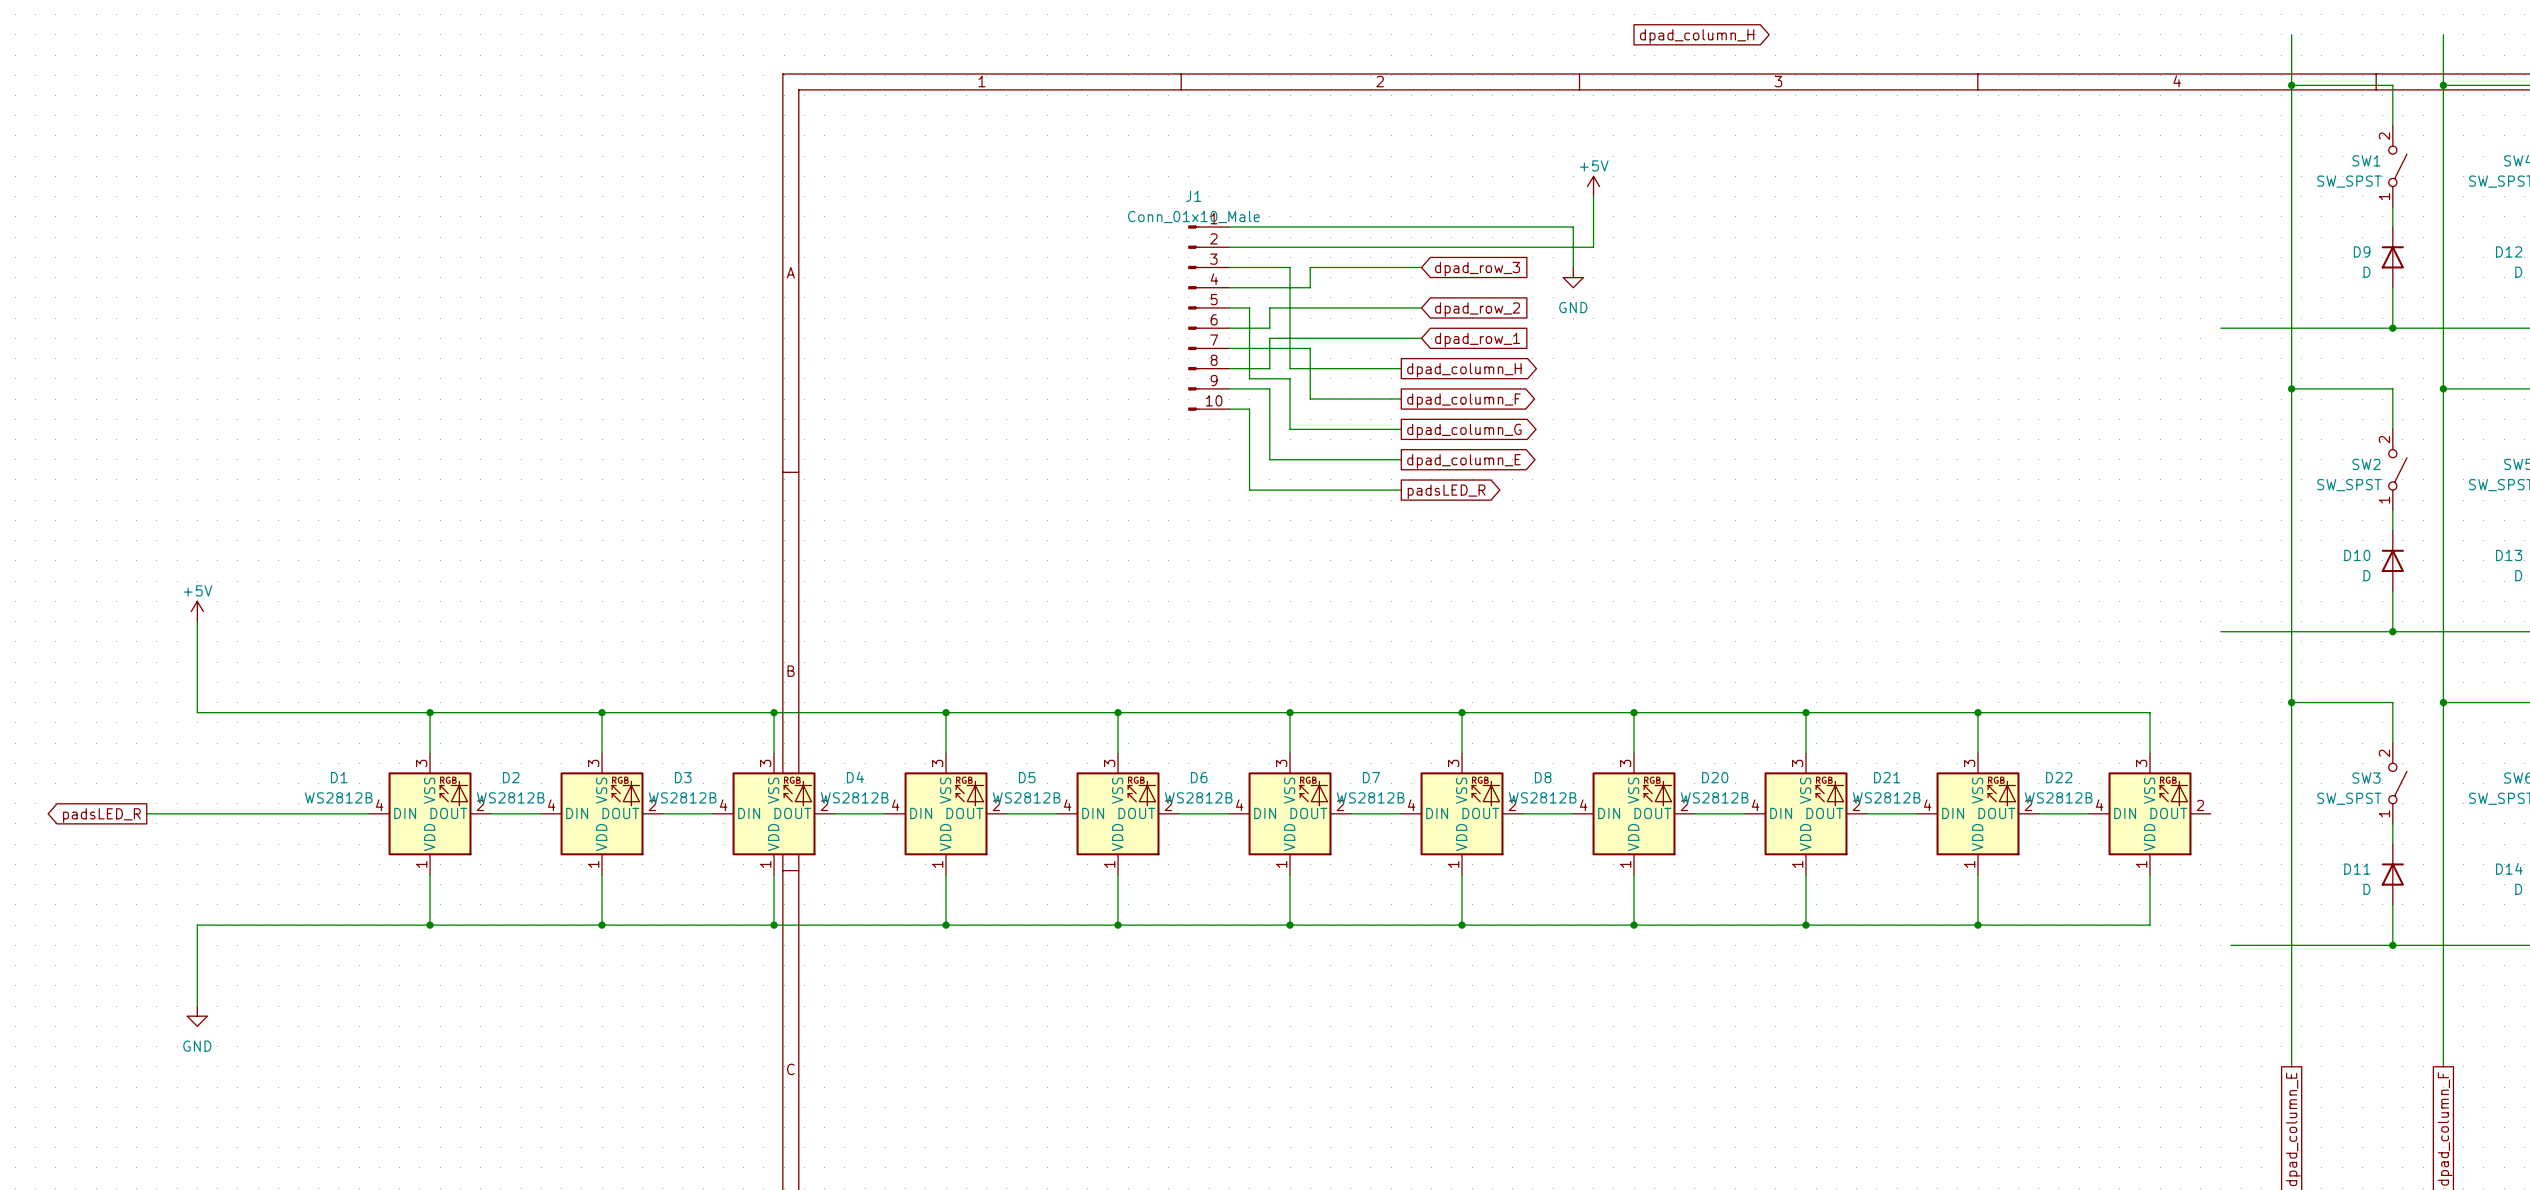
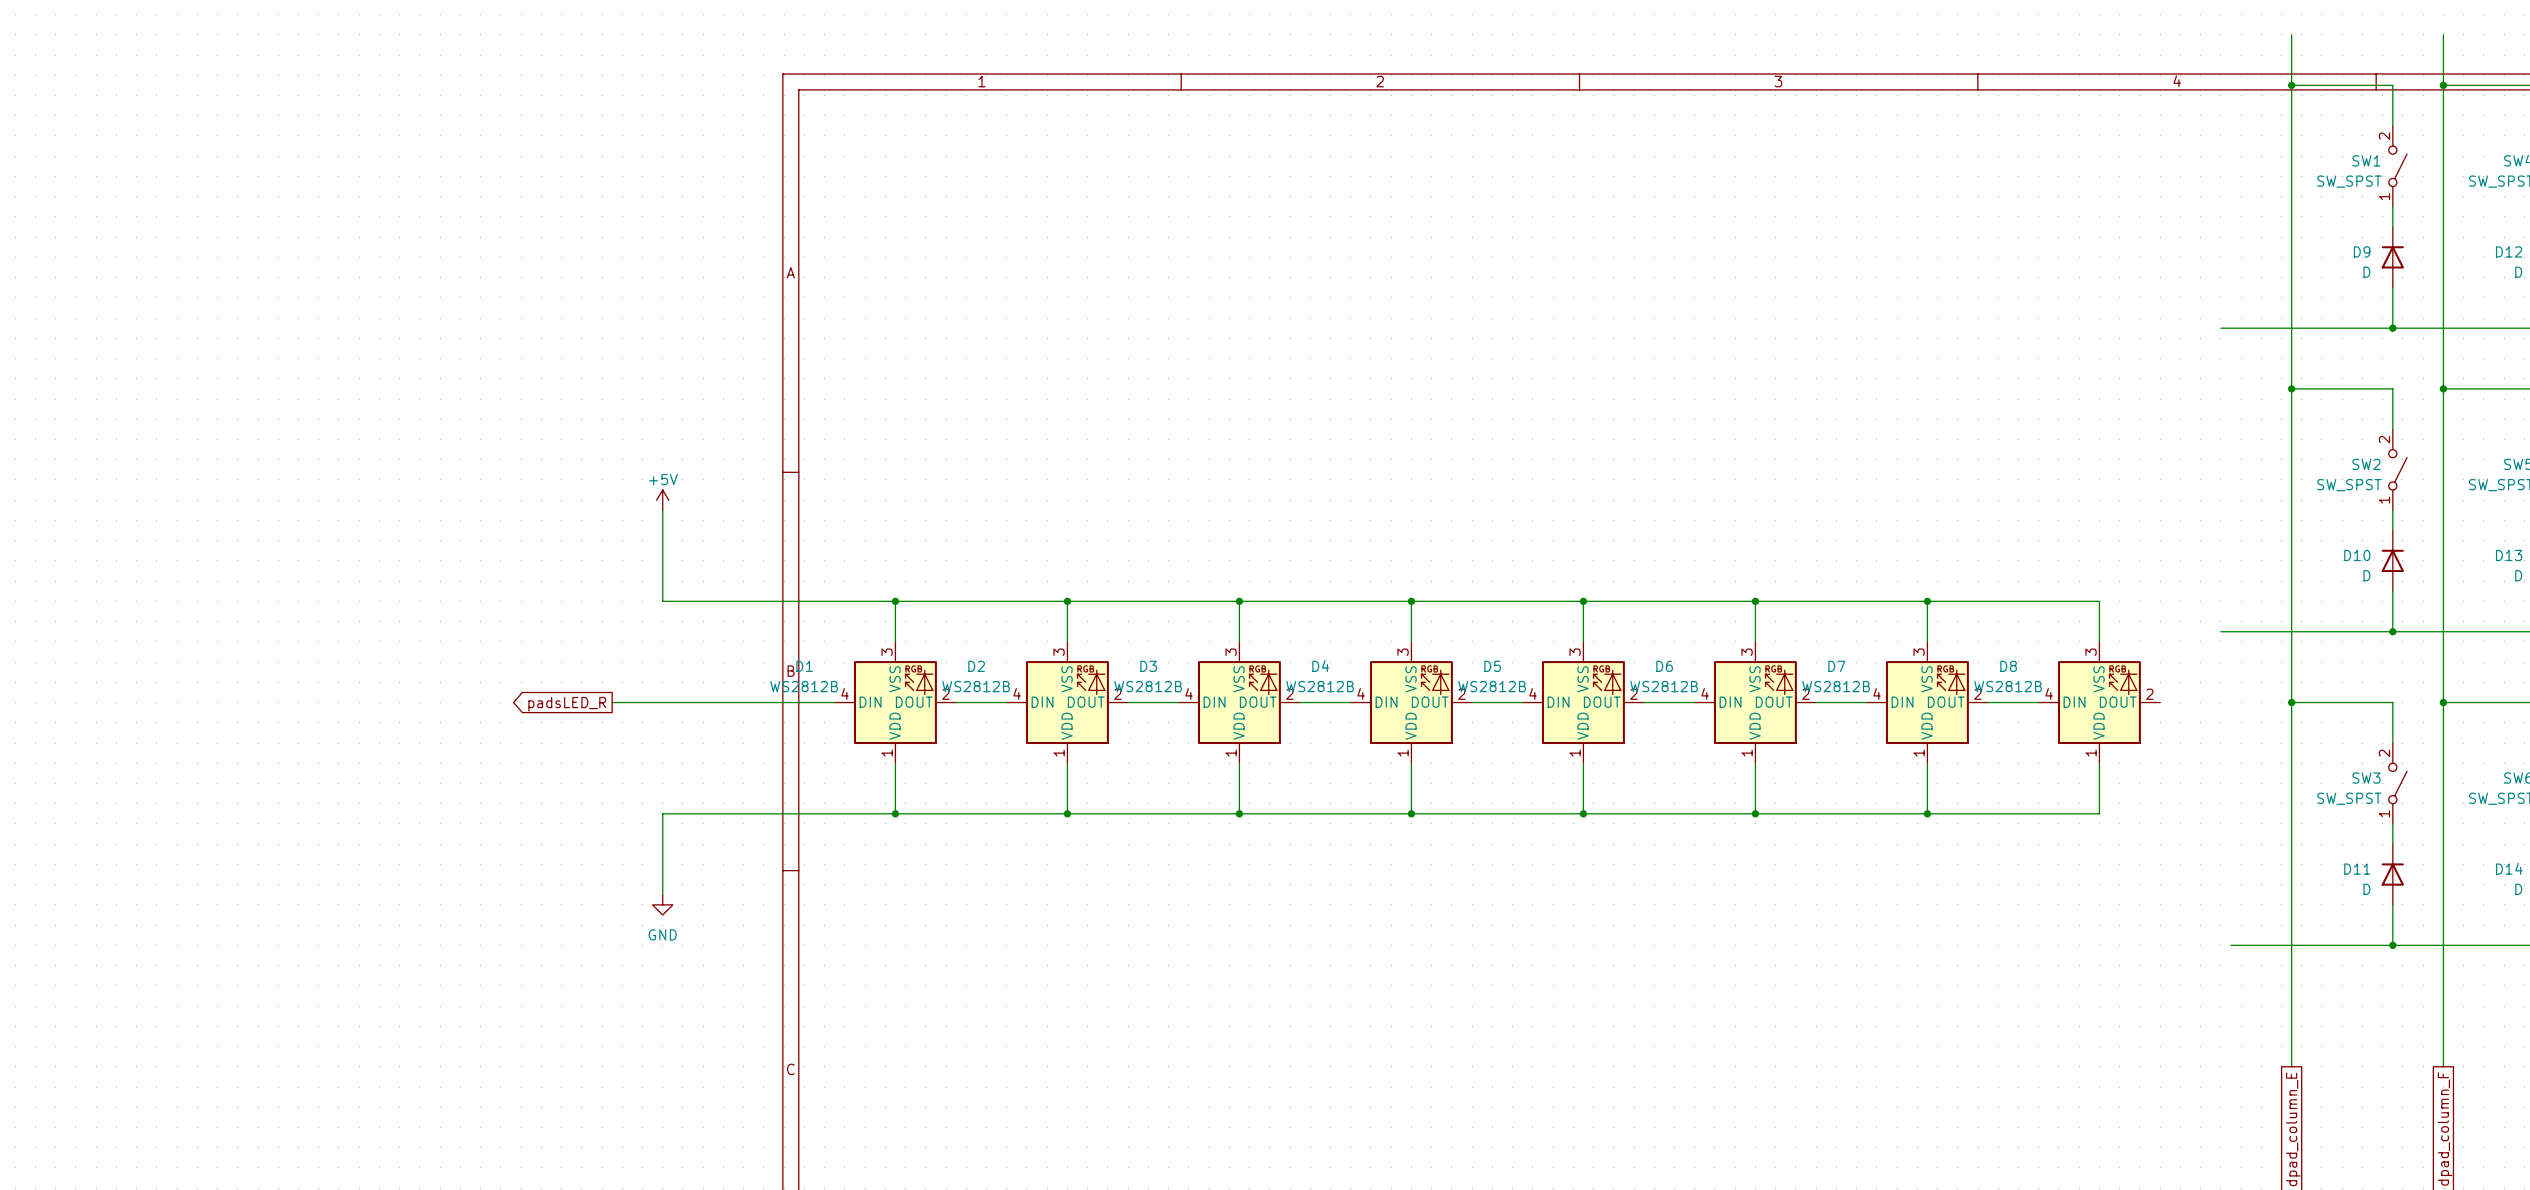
global label: dpad_column_H (1697, 36) -> none
power symbol: +5V (1593, 186) -> none
wire: (1593, 196) (1593, 247) (1229, 247) -> none
wire: (1229, 227) (1573, 227) (1573, 267) -> none
wire: (1229, 267) (1290, 267) (1290, 368) (1401, 368) -> none
wire: (1421, 267) (1310, 267) (1310, 287) (1229, 287) -> none
global label: dpad_row_3 (1477, 269) -> none
power symbol: GND (1573, 277) -> none
wire: (1229, 307) (1249, 307) (1249, 378) (1290, 378) (1290, 429) (1401, 429) -> none
wire: (1421, 307) (1269, 307) (1269, 328) (1229, 328) -> none
global label: dpad_row_2 (1477, 309) -> none
J1: Conn_01x10_Male (1208, 318) -> none
wire: (1421, 338) (1269, 338) (1269, 368) (1229, 368) -> none
global label: dpad_row_1 (1477, 340) -> none
wire: (1229, 348) (1310, 348) (1310, 399) (1401, 399) -> none
global label: dpad_column_H (1464, 370) -> none
wire: (1229, 388) (1269, 388) (1269, 459) (1401, 459) -> none
global label: dpad_column_F (1463, 400) -> none
wire: (1229, 409) (1249, 409) (1249, 490) (1401, 490) -> none
global label: dpad_column_G (1464, 431) -> none
global label: dpad_column_E (1463, 461) -> none
global label: padsLED_R (1446, 491) -> none
power symbol: none -> +5V (662, 500)
wire: none -> (662, 510) (662, 601) (2099, 601) (2099, 641)
junction: none -> (895, 601)
junction: none -> (1067, 601)
junction: none -> (1239, 601)
junction: none -> (1411, 601)
junction: none -> (1583, 601)
junction: none -> (1755, 601)
junction: none -> (1927, 601)
power symbol: +5V (197, 611) -> none
wire: (197, 621) (197, 712) (2149, 712) (2149, 753) -> none
wire: none -> (612, 702) (834, 702)
wire: none -> (956, 702) (1006, 702)
wire: none -> (1128, 702) (1178, 702)
wire: none -> (1300, 702) (1350, 702)
wire: none -> (1472, 702) (1522, 702)
wire: none -> (1644, 702) (1694, 702)
wire: none -> (1816, 702) (1866, 702)
wire: none -> (1988, 702) (2038, 702)
global label: none -> padsLED_R (567, 704)
wire: (430, 712) (430, 753) -> none
junction: (430, 712) -> none
wire: (602, 712) (602, 753) -> none
junction: (602, 712) -> none
wire: (774, 712) (774, 753) -> none
junction: (774, 712) -> none
wire: (946, 712) (946, 753) -> (895, 601) (895, 641)
junction: (946, 712) -> none
wire: (1118, 712) (1118, 753) -> (1067, 601) (1067, 641)
junction: (1118, 712) -> none
wire: (1290, 712) (1290, 753) -> (1239, 601) (1239, 641)
junction: (1290, 712) -> none
wire: (1462, 712) (1462, 753) -> (1411, 601) (1411, 641)
junction: (1462, 712) -> none
wire: (1634, 712) (1634, 753) -> (1583, 601) (1583, 641)
junction: (1634, 712) -> none
wire: (1806, 712) (1806, 753) -> (1755, 601) (1755, 641)
junction: (1806, 712) -> none
wire: (1978, 712) (1978, 753) -> (1927, 601) (1927, 641)
junction: (1978, 712) -> none
wire: none -> (2099, 763) (2099, 813) (2089, 813)
wire: (146, 813) (369, 813) -> none
D1 position: (430, 813) -> (895, 702)
wire: (490, 813) (541, 813) -> none
D2 position: (602, 813) -> (1067, 702)
wire: none -> (662, 813) (662, 894)
D3 position: (774, 813) -> (1239, 702)
junction: none -> (895, 813)
D4 position: (946, 813) -> (1411, 702)
junction: none -> (1067, 813)
D5 position: (1118, 813) -> (1583, 702)
junction: none -> (1239, 813)
D6 position: (1290, 813) -> (1755, 702)
junction: none -> (1411, 813)
D7 position: (1462, 813) -> (1927, 702)
junction: none -> (1583, 813)
D8 position: (1634, 813) -> (2099, 702)
junction: none -> (1755, 813)
D20: WS2812B (1806, 813) -> none
junction: none -> (1927, 813)
D21: WS2812B (1978, 813) -> none
D22: WS2812B (2149, 813) -> none
global label: padsLED_R (101, 815) -> none
wire: (430, 874) (430, 925) -> none
wire: (602, 874) (602, 925) -> none
wire: (774, 874) (774, 925) -> none
wire: (946, 874) (946, 925) -> (895, 763) (895, 813)
wire: (1118, 874) (1118, 925) -> (1067, 763) (1067, 813)
wire: (1290, 874) (1290, 925) -> (1239, 763) (1239, 813)
wire: (1462, 874) (1462, 925) -> (1411, 763) (1411, 813)
wire: (1634, 874) (1634, 925) -> (1583, 763) (1583, 813)
wire: (1806, 874) (1806, 925) -> (1755, 763) (1755, 813)
wire: (1978, 874) (1978, 925) -> (1927, 763) (1927, 813)
wire: (2149, 874) (2149, 925) (197, 925) (197, 1006) -> none
power symbol: none -> GND (662, 904)
junction: (430, 925) -> none
junction: (602, 925) -> none
junction: (774, 925) -> none
junction: (946, 925) -> none
junction: (1118, 925) -> none
junction: (1290, 925) -> none
junction: (1462, 925) -> none
junction: (1634, 925) -> none
junction: (1806, 925) -> none
junction: (1978, 925) -> none
power symbol: GND (197, 1016) -> none

